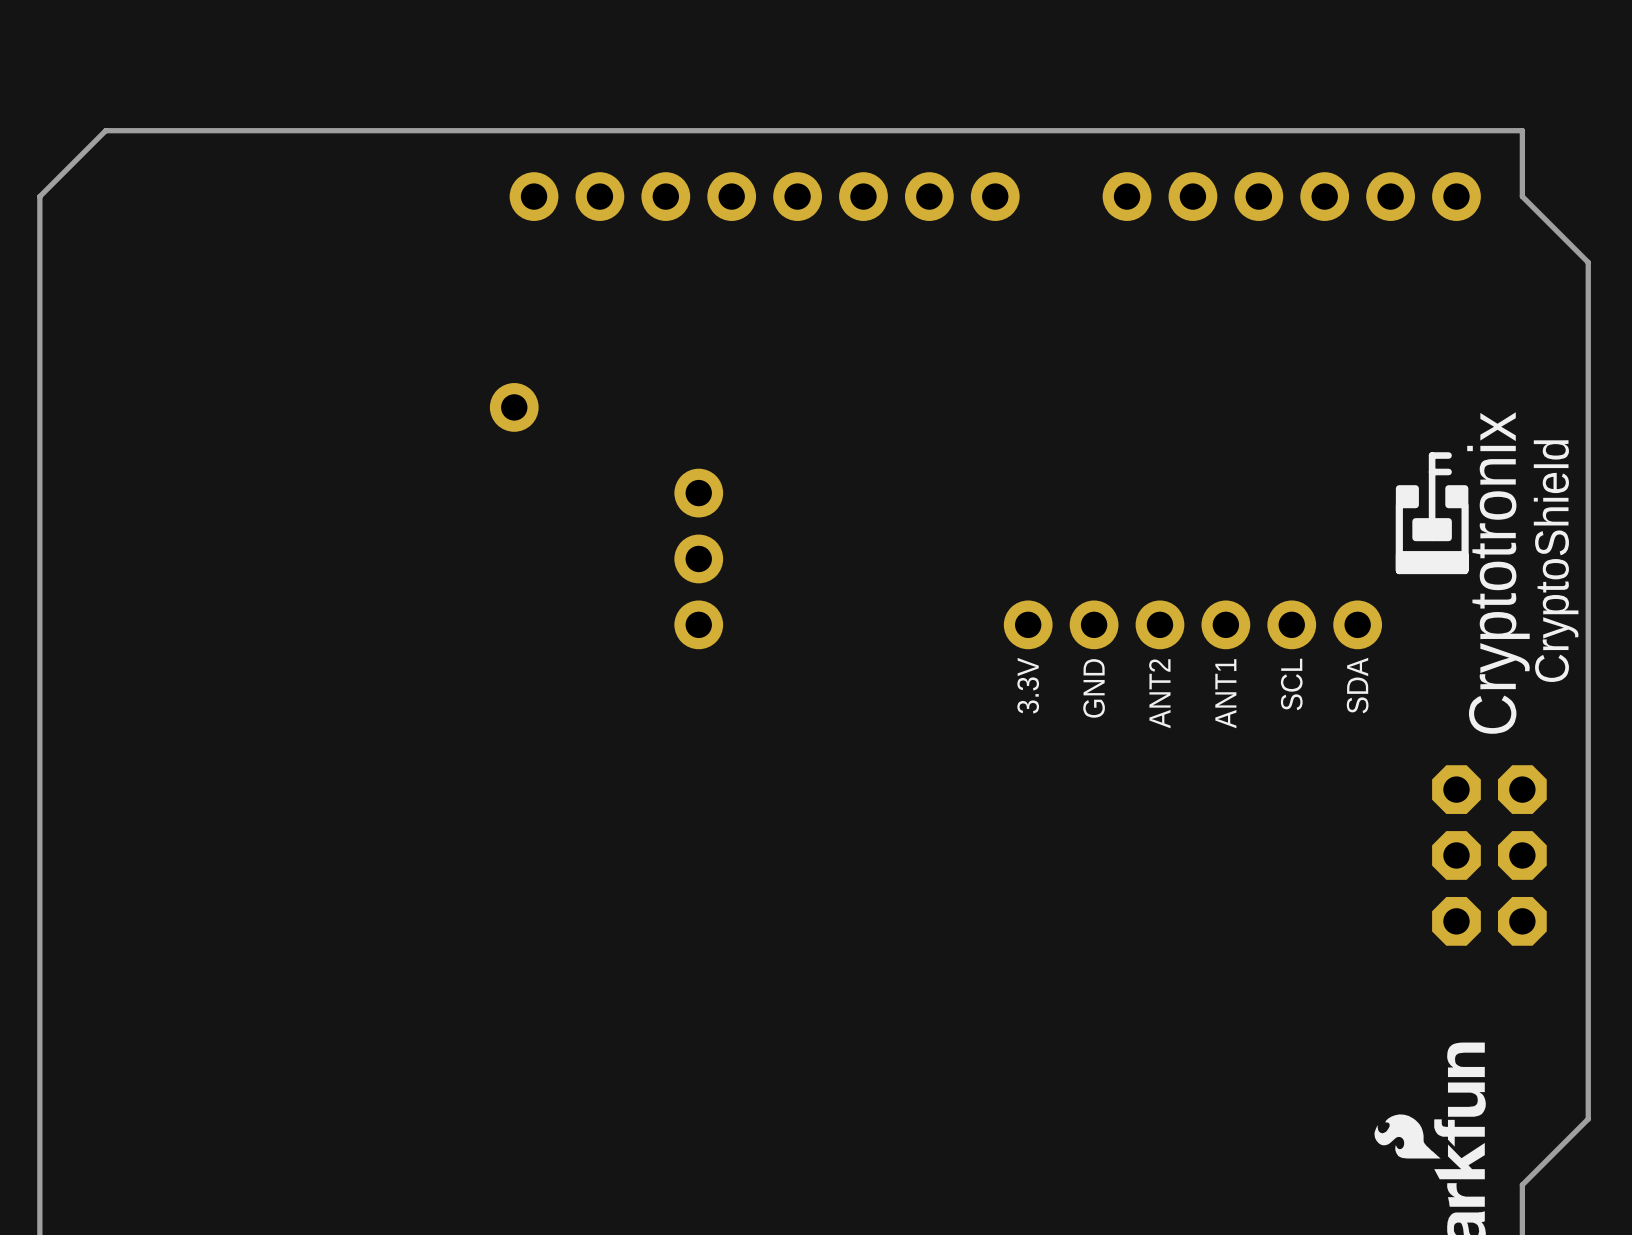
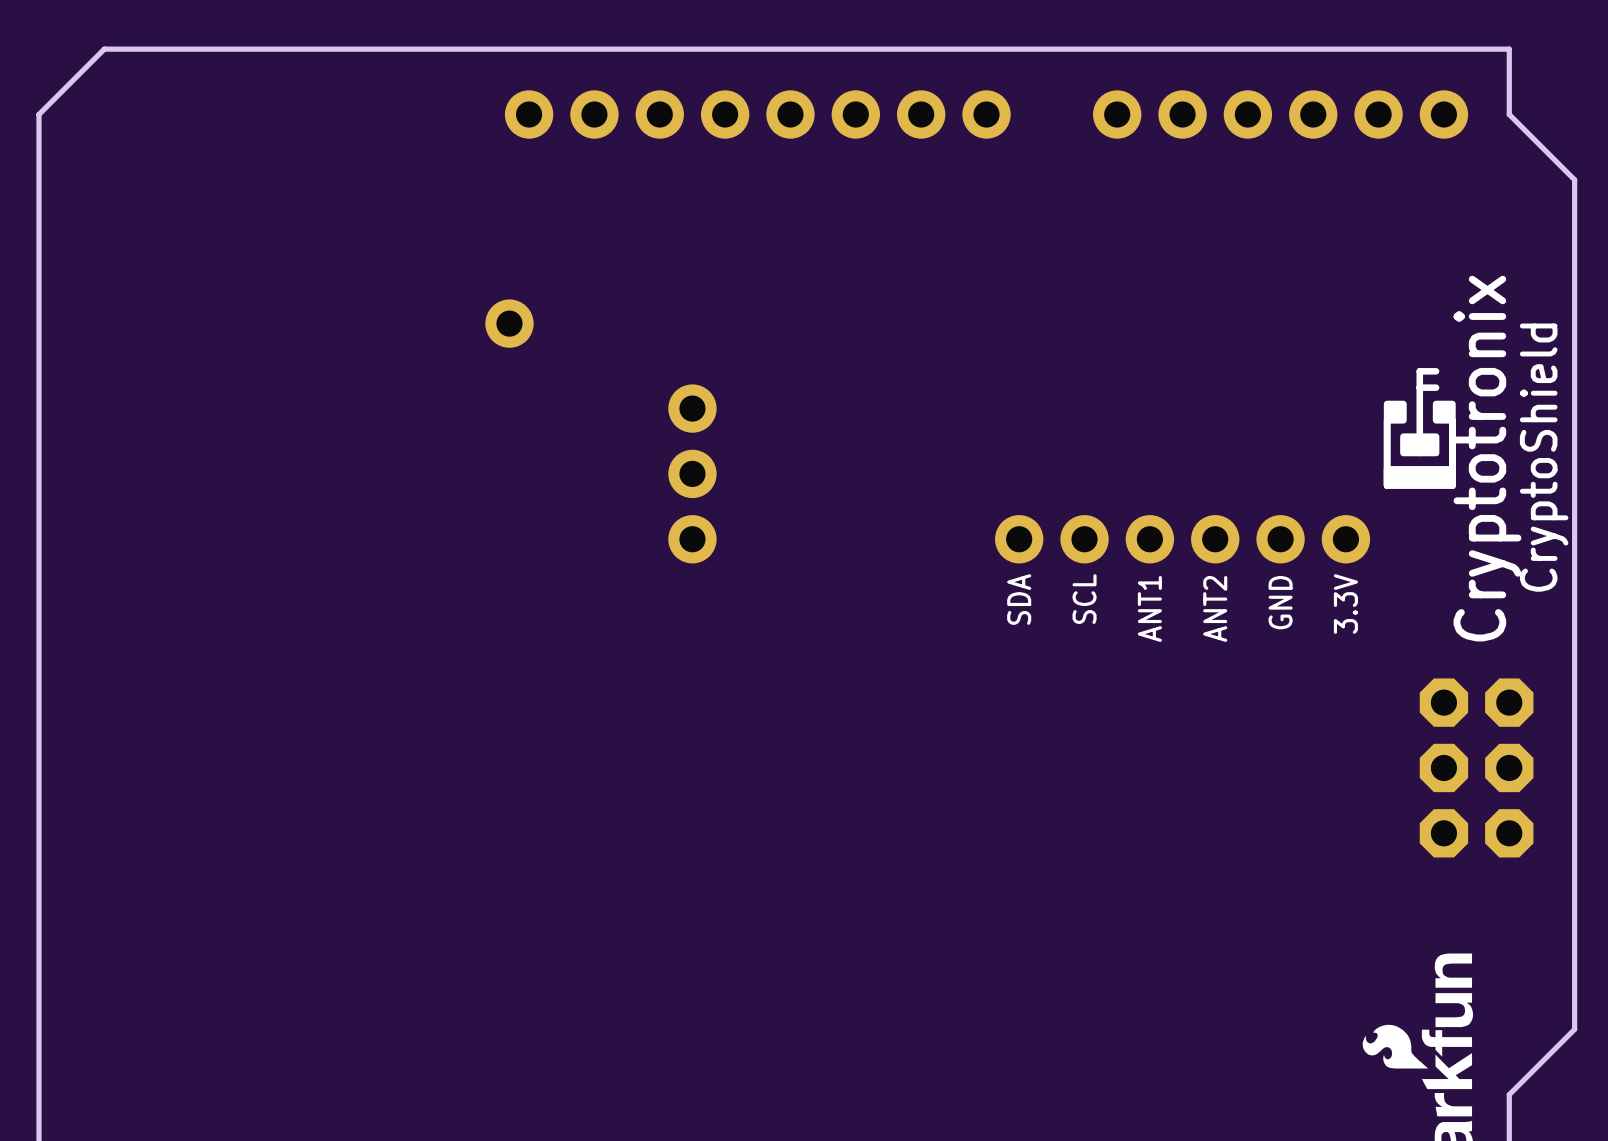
text: SCL (1291, 684) -> GND (1280, 602)
text: 3.3V (1028, 685) -> SDA (1019, 599)
text: SDA (1357, 685) -> 3.3V (1345, 604)
text: GND (1094, 688) -> SCL (1084, 599)
text: ANT2 (1159, 693) -> ANT1 (1149, 608)
text: ANT1 (1225, 693) -> ANT2 (1215, 608)

